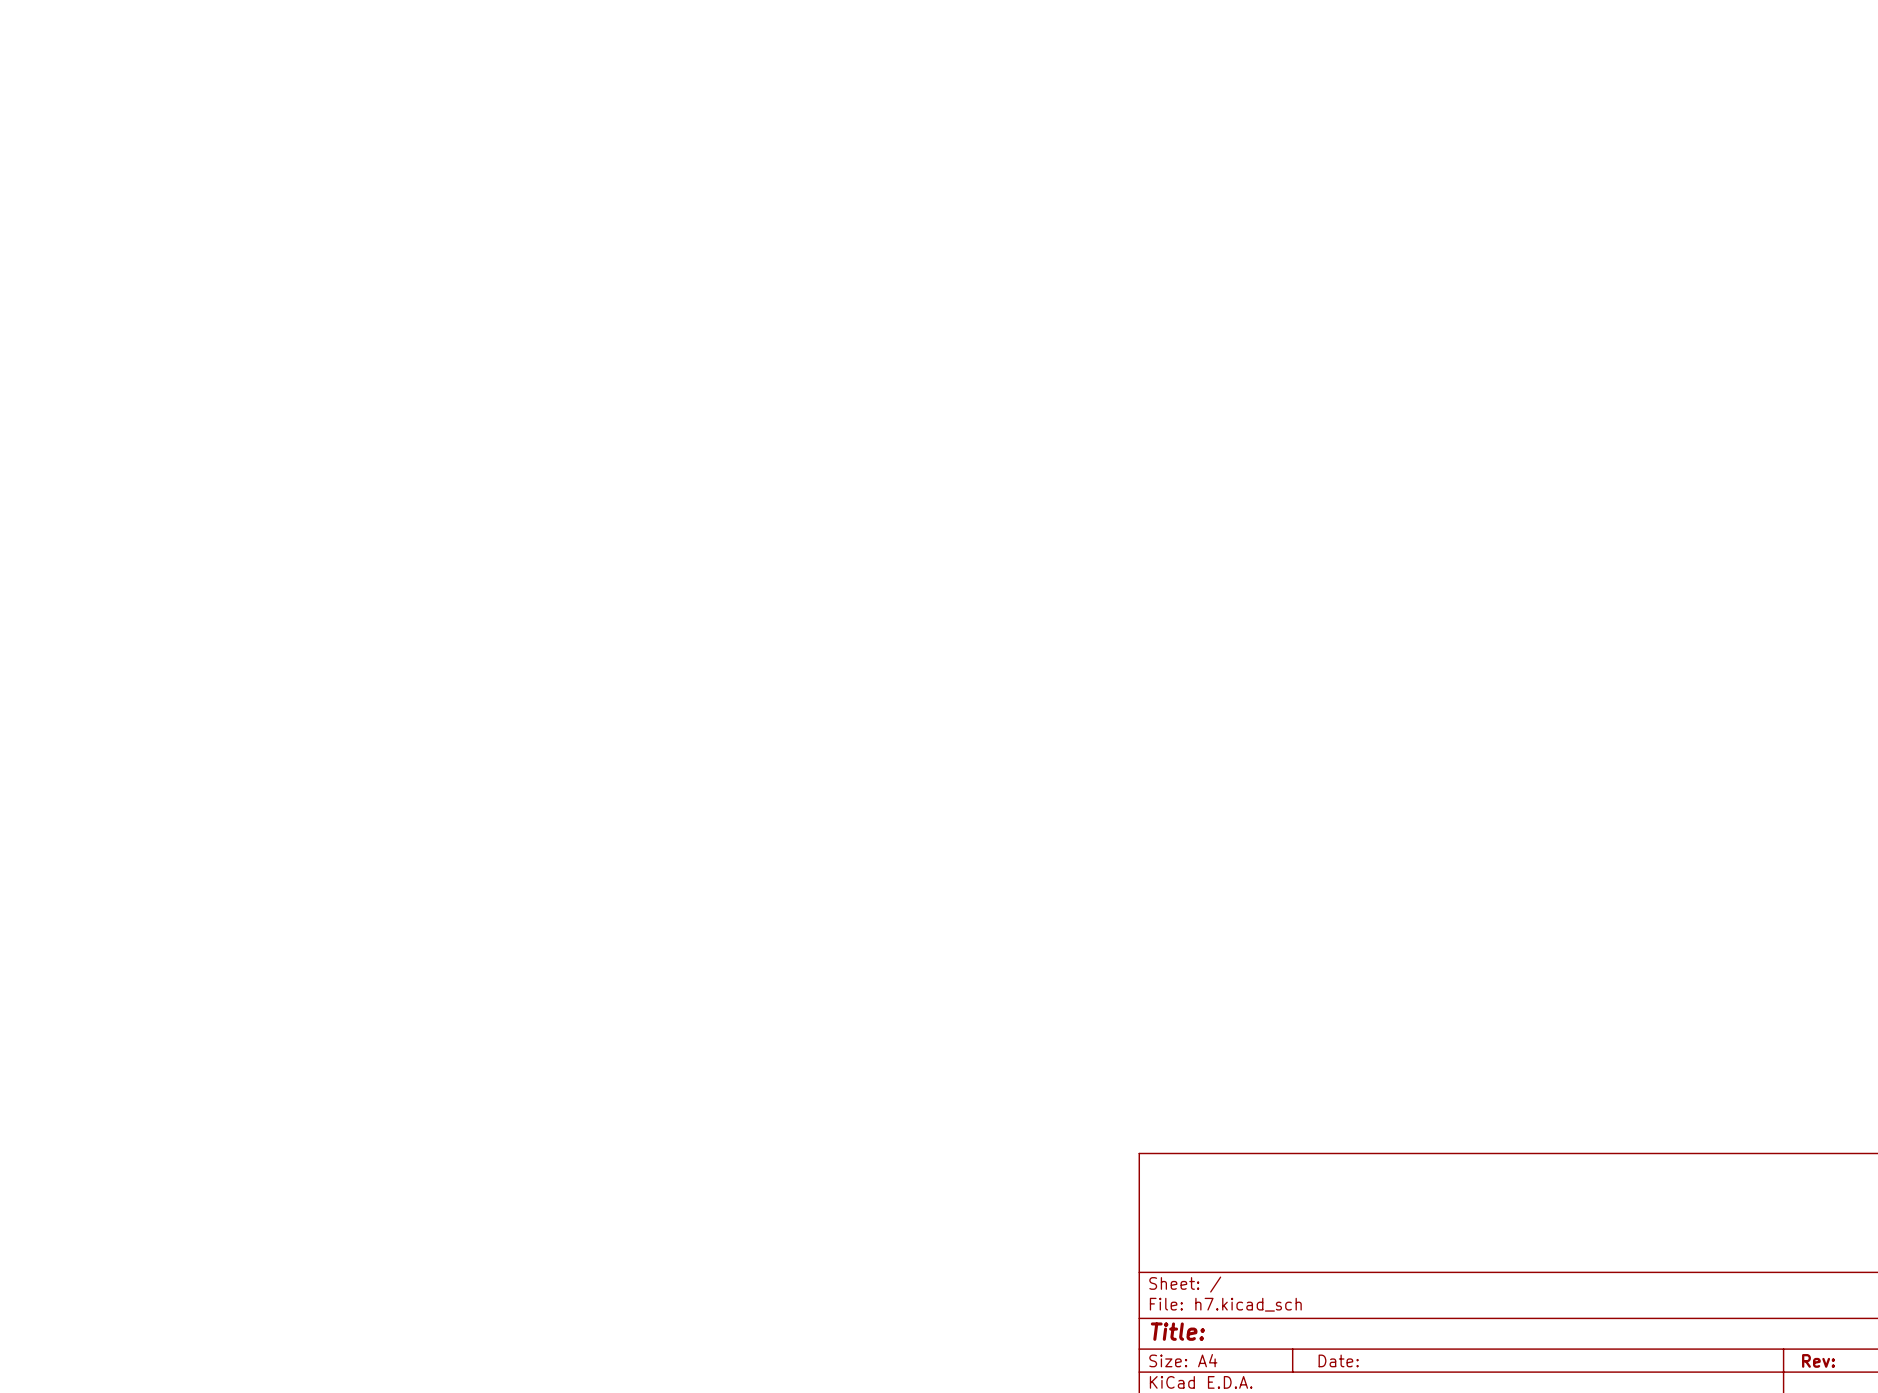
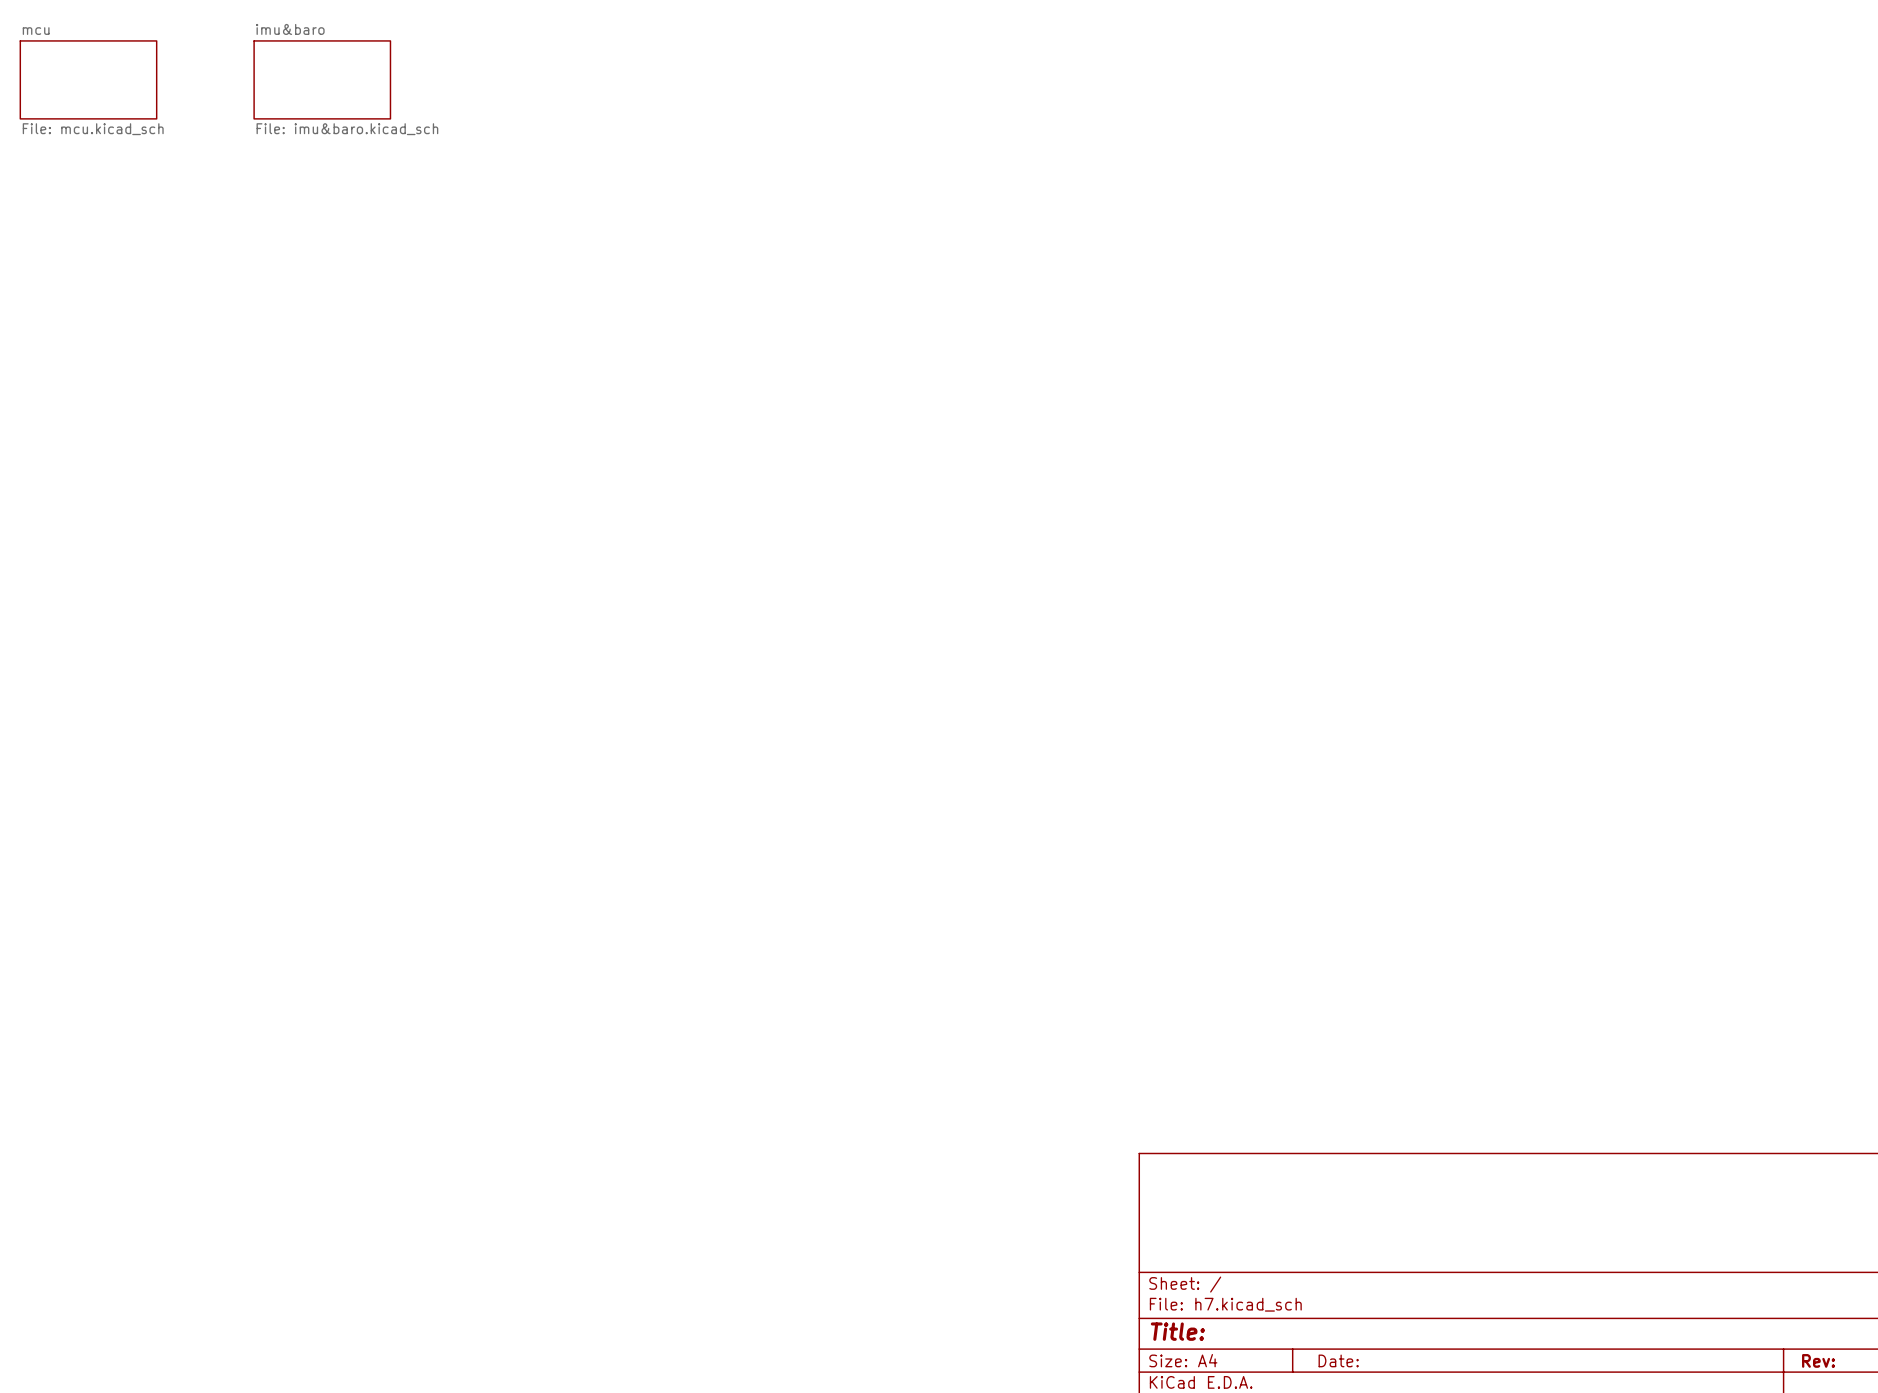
sheet mcu: none -> File: mcu.kicad_sch (88, 79)
sheet imu&baro: none -> File: imu&baro.kicad_sch (322, 79)

